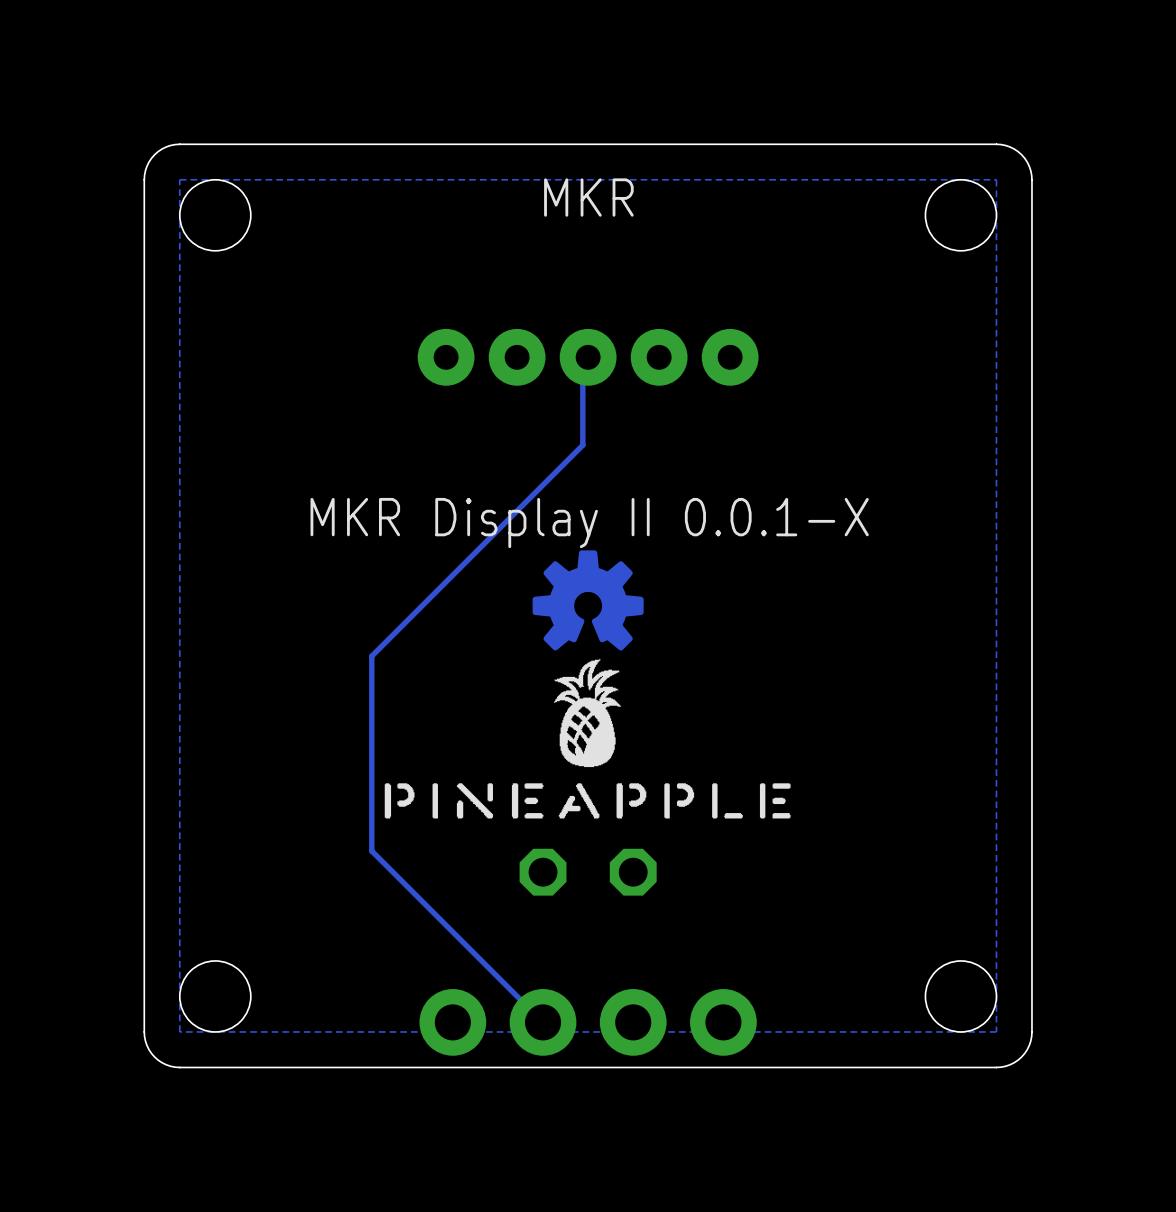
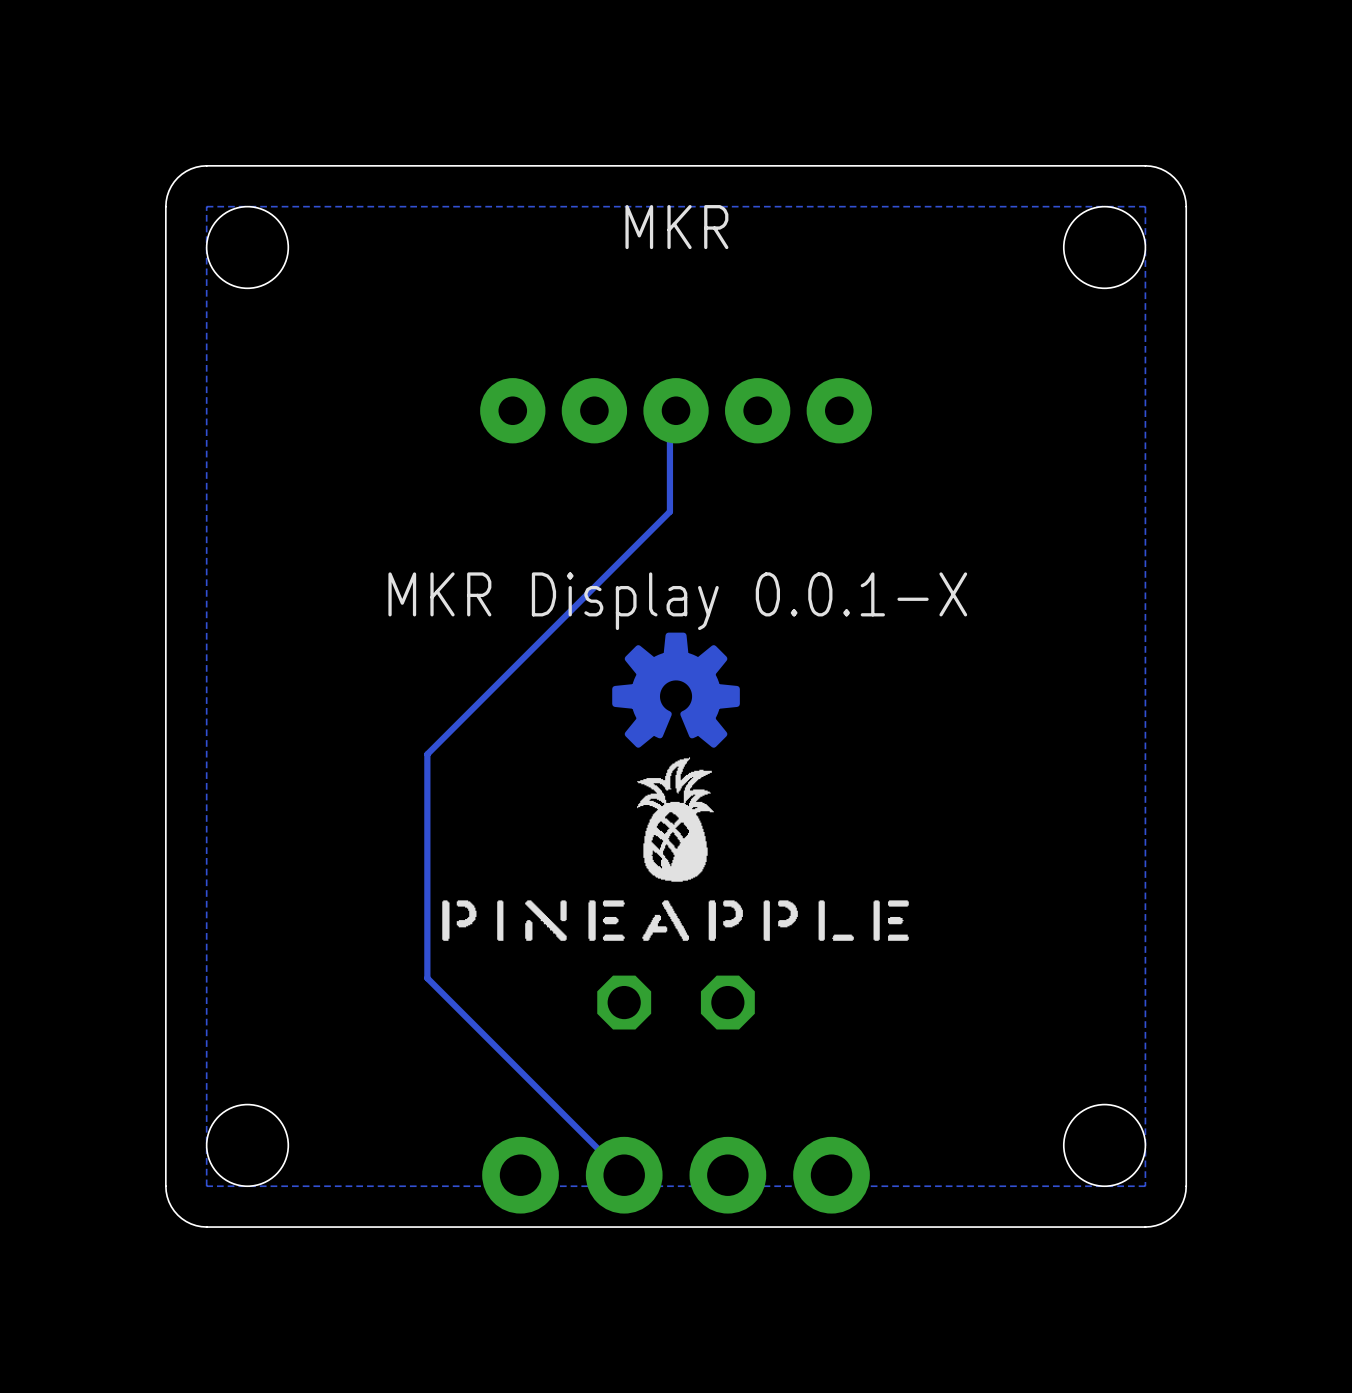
text: MKR Display II 0.0.1-X (589, 523) -> MKR Display 0.0.1-X (677, 601)

